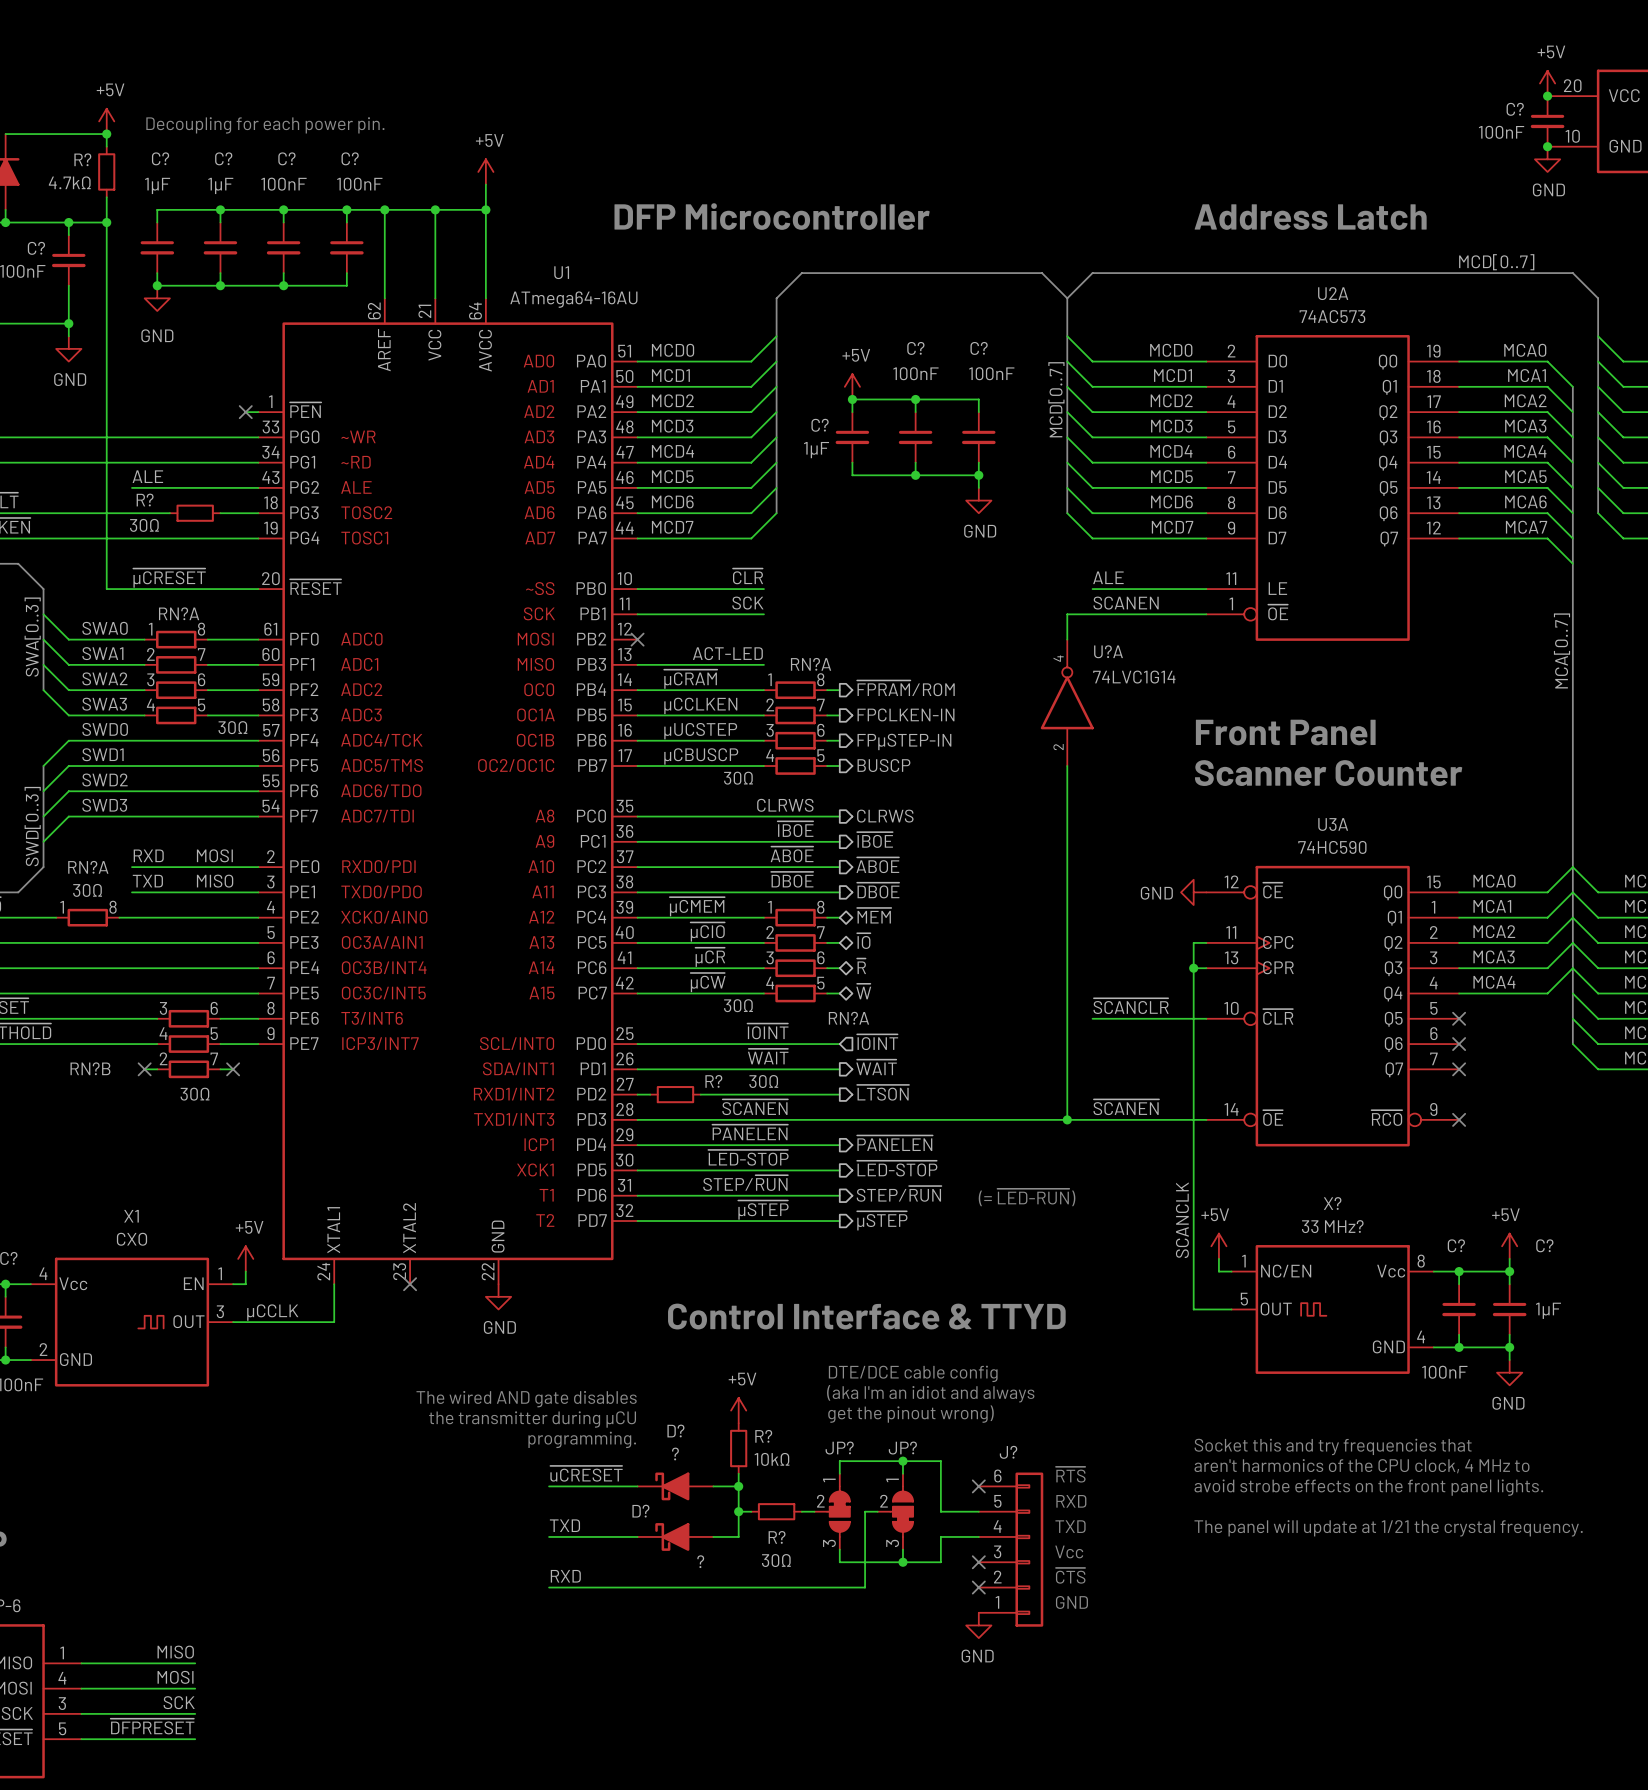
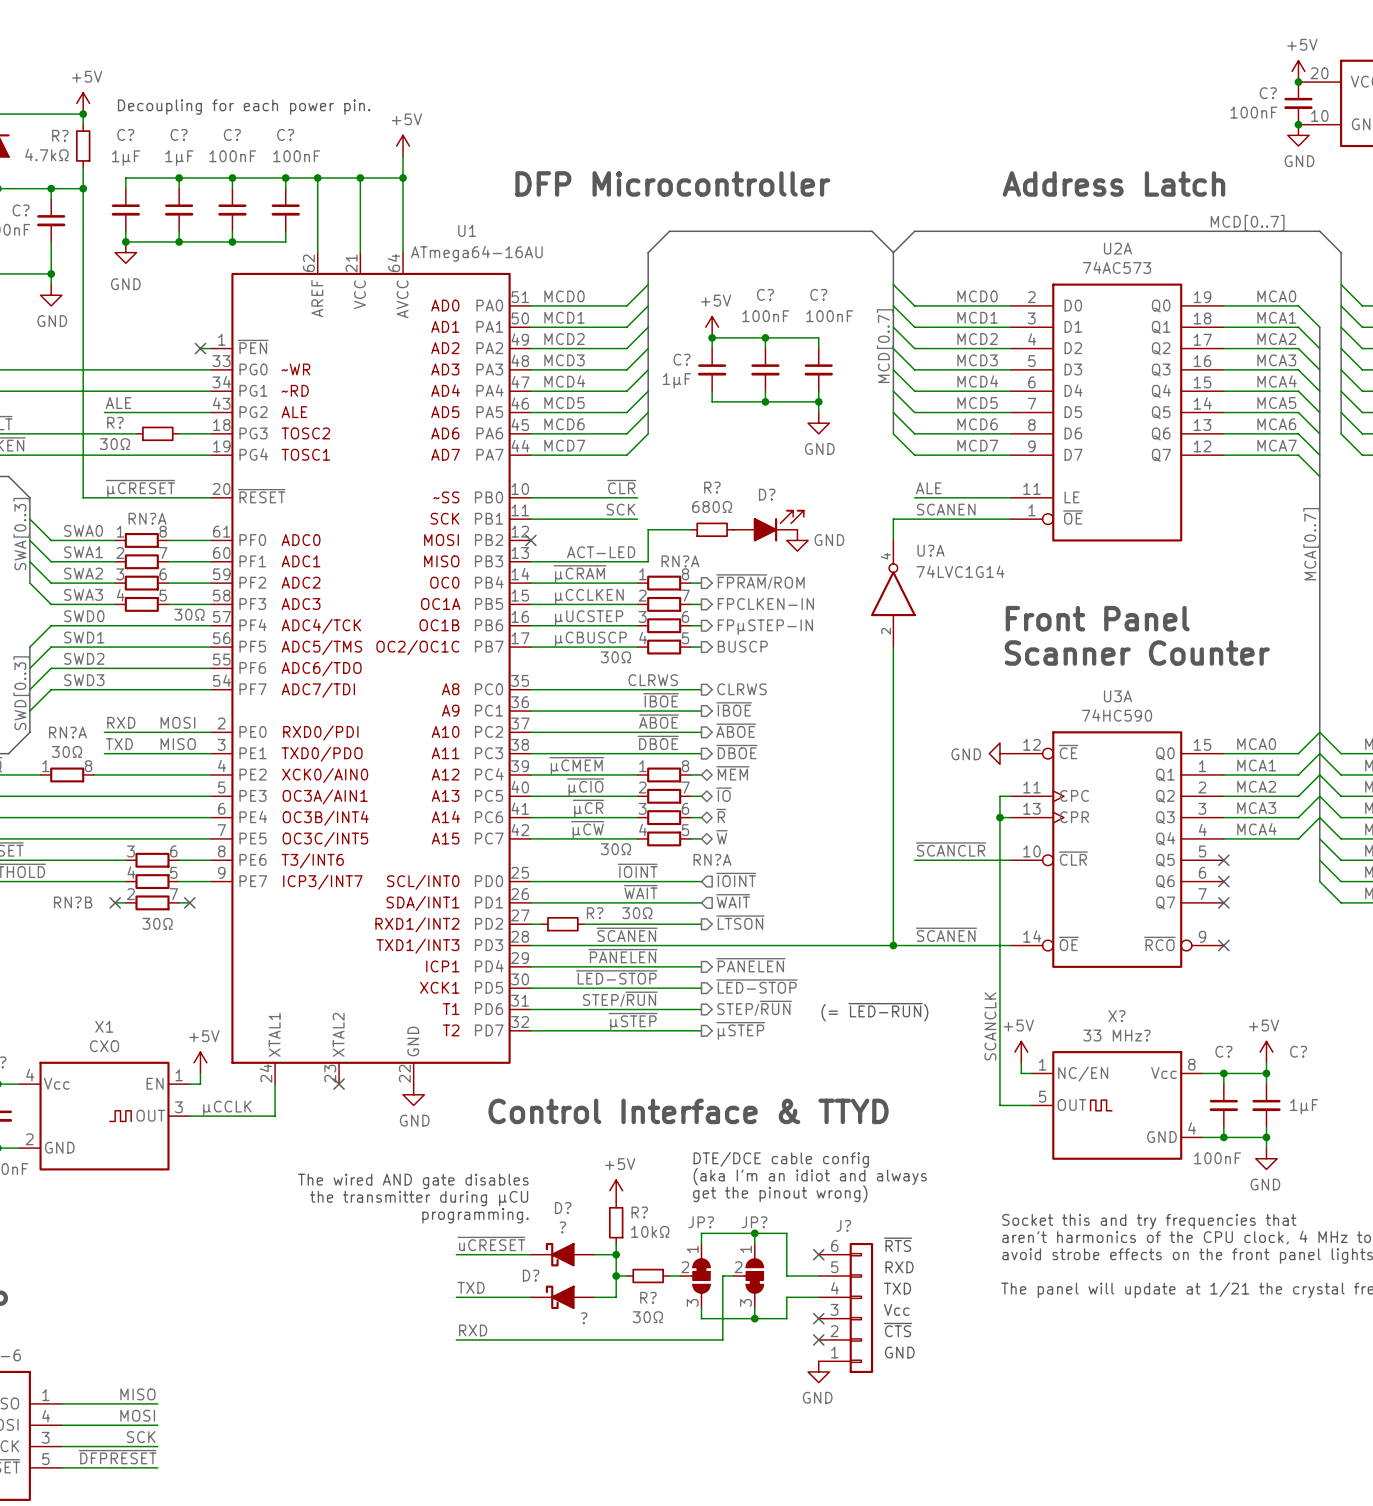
D?: none -> (768, 526)
wire: none -> (690, 529) (648, 529) (648, 561) (637, 561)
R?: none -> 680Ω (712, 529)
power symbol: none -> GND (797, 540)
hierarchical label shape: output (876, 1067) -> input (733, 901)

